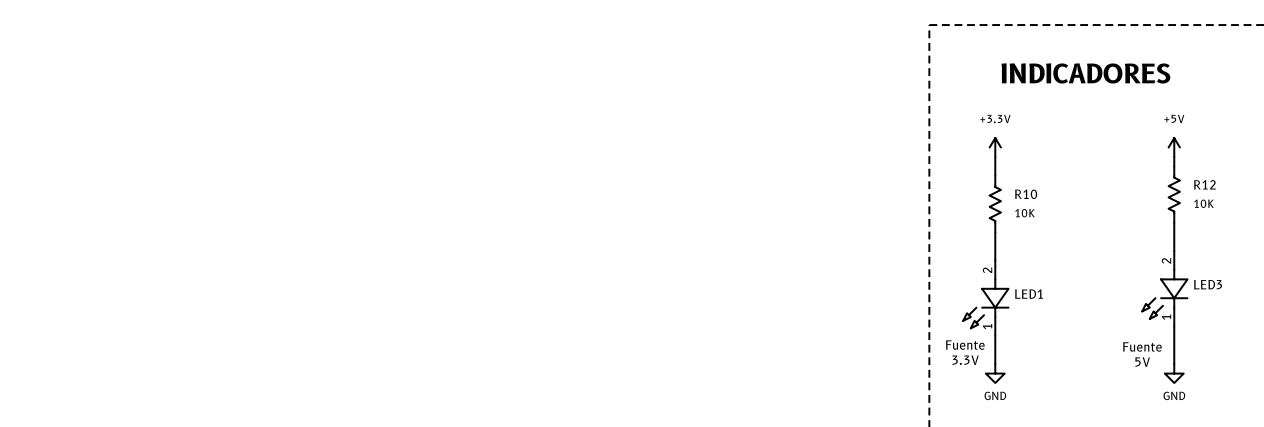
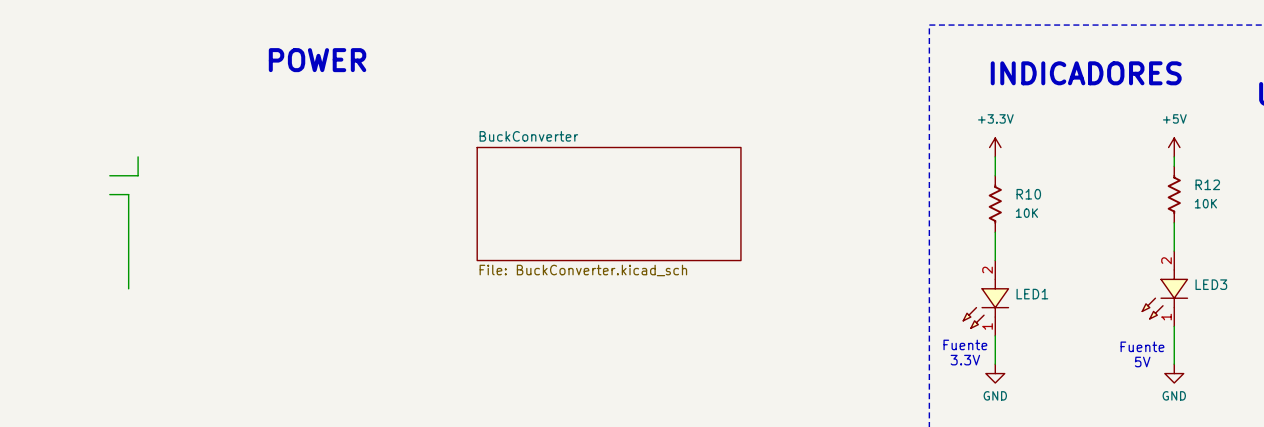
text: none -> POWER (317, 60)
wire: none -> (138, 156) (138, 175) (109, 175)
wire: none -> (109, 194) (128, 194) (128, 288)
sheet BuckConverter: none -> File: BuckConverter.kicad_sch (609, 204)

